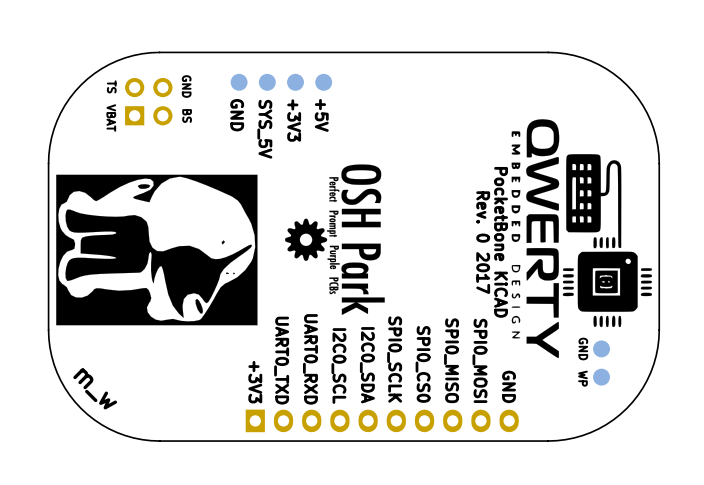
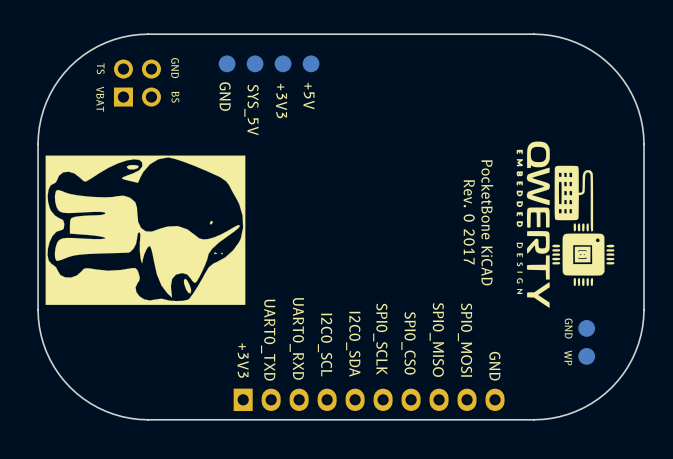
drawing shape: [511, 119, 652, 359] -> [516, 141, 615, 308]
drawing: [285, 164, 385, 315] -> none
text: m_w (95, 388) -> none

